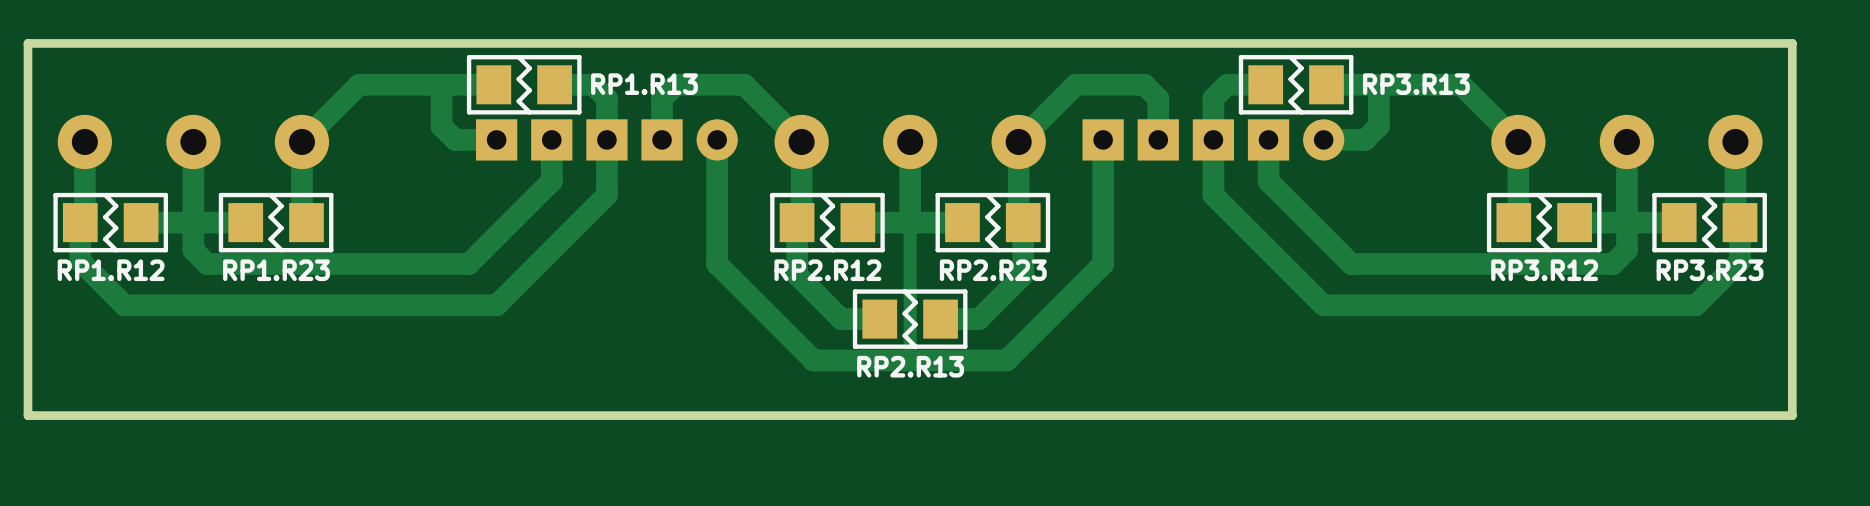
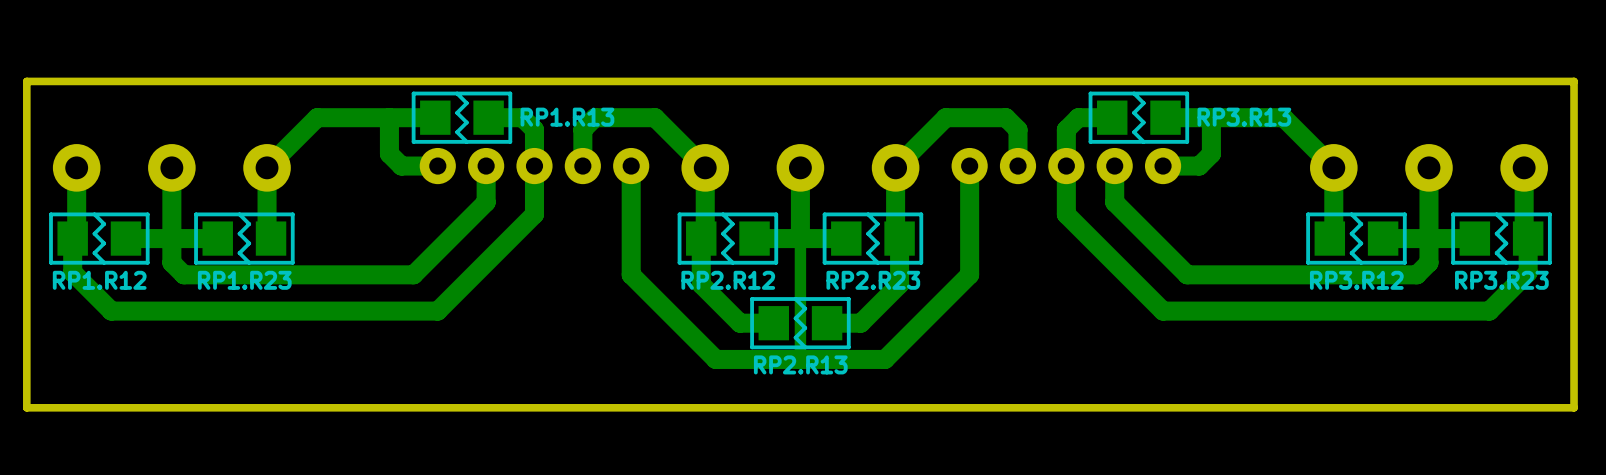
part footprint: [476, 119, 738, 161] -> [419, 147, 650, 185]
part footprint: [1082, 119, 1345, 161] -> [951, 147, 1182, 185]

